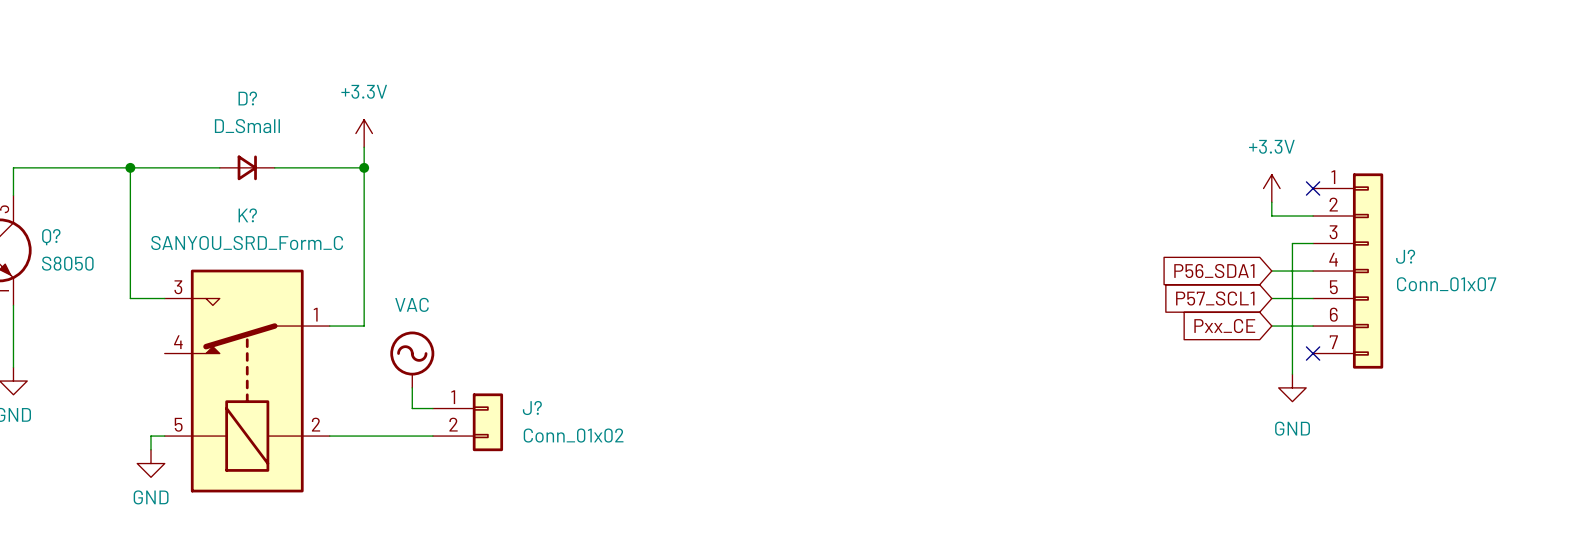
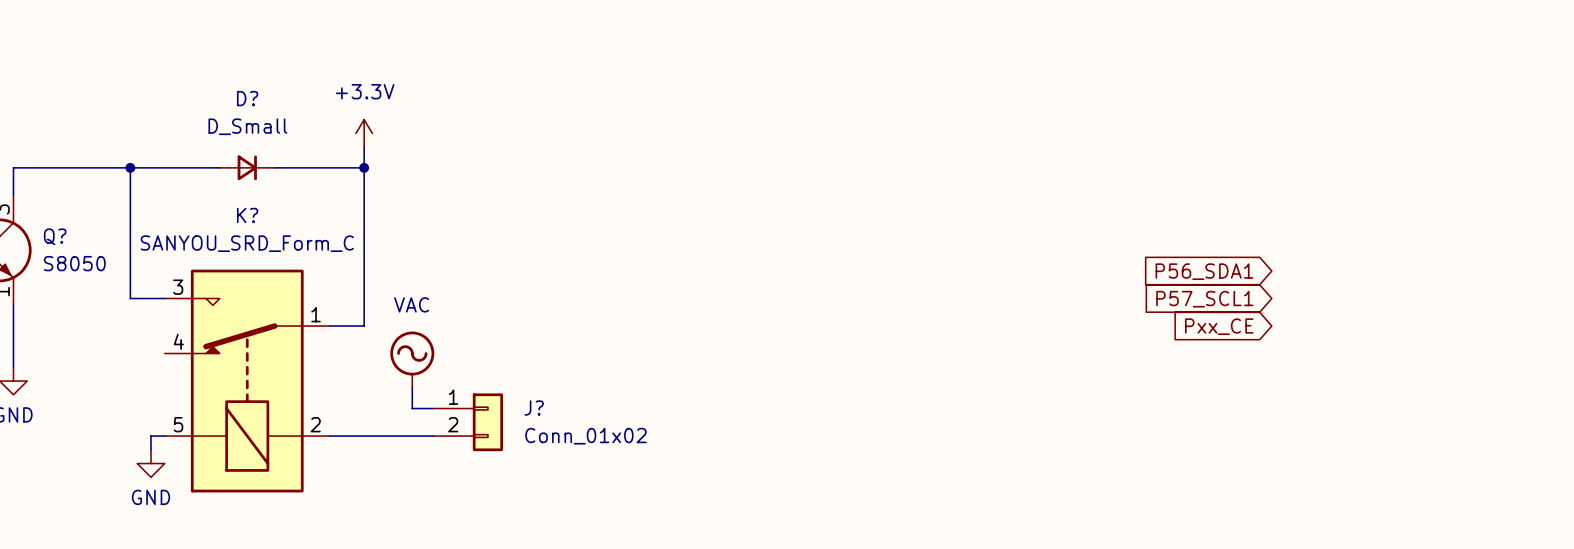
power symbol: +3.3V (1271, 188) -> none
no-connect mark: (1313, 188) -> none
wire: (1271, 202) (1271, 216) (1313, 216) -> none
wire: (1313, 243) (1292, 243) (1292, 374) -> none
wire: (1271, 271) (1313, 271) -> none
J?: Conn_01x07 (1348, 271) -> none
wire: (1271, 298) (1313, 298) -> none
wire: (1271, 326) (1313, 326) -> none
no-connect mark: (1313, 353) -> none
power symbol: GND (1292, 387) -> none

